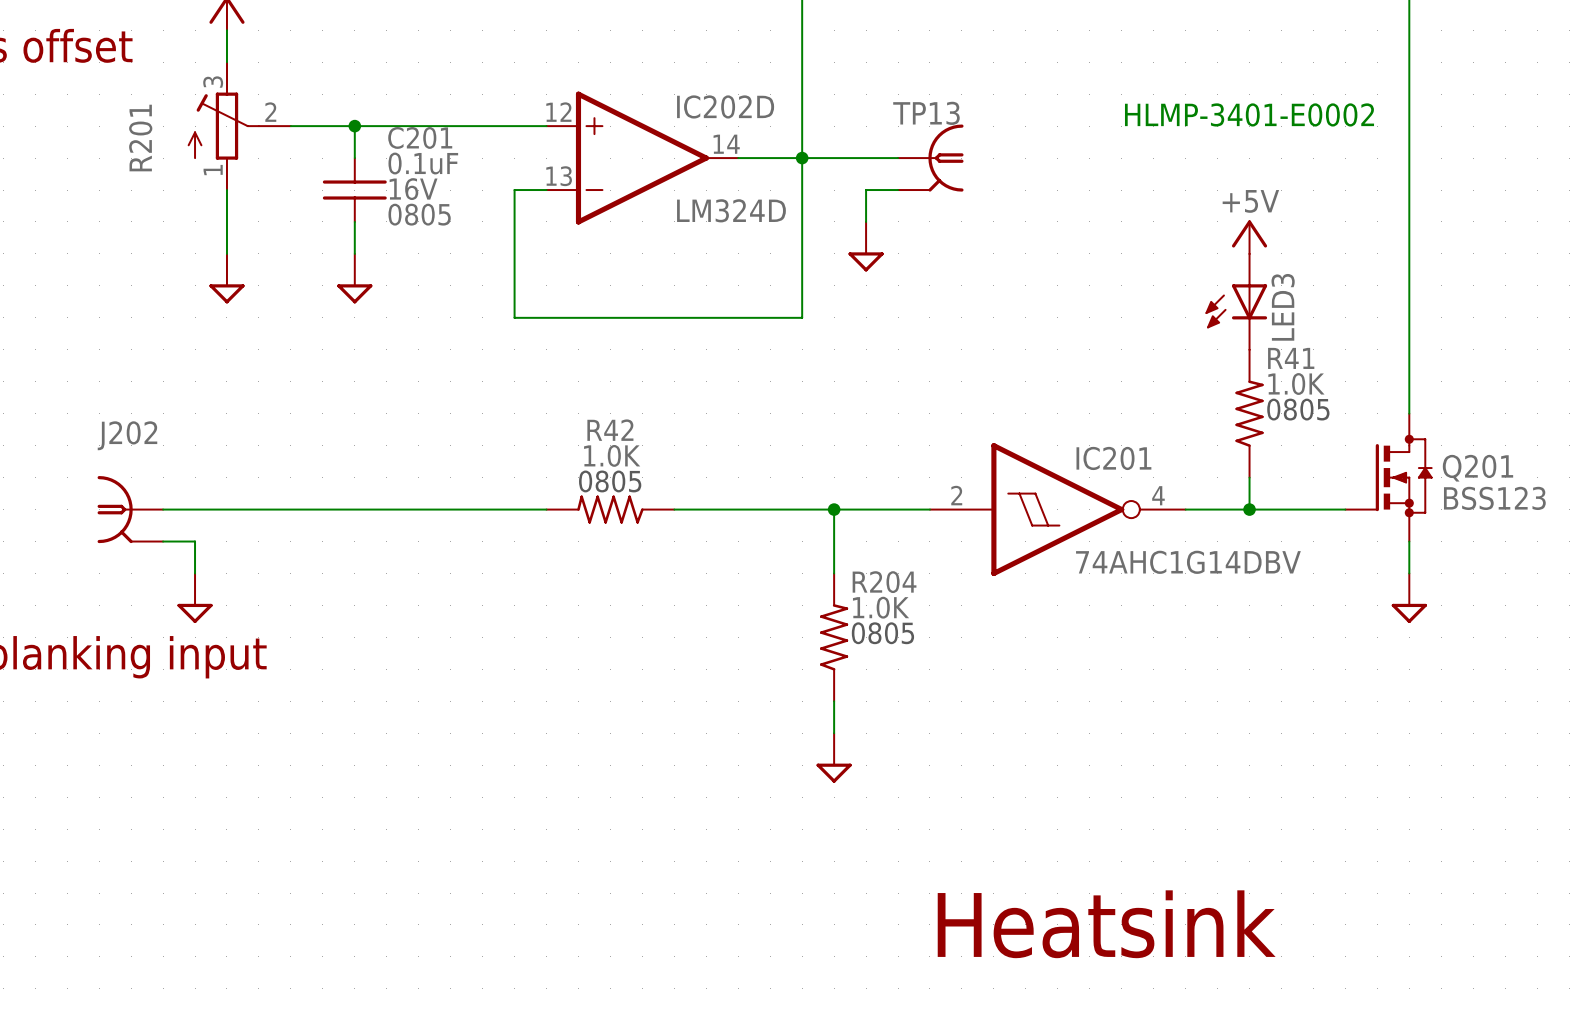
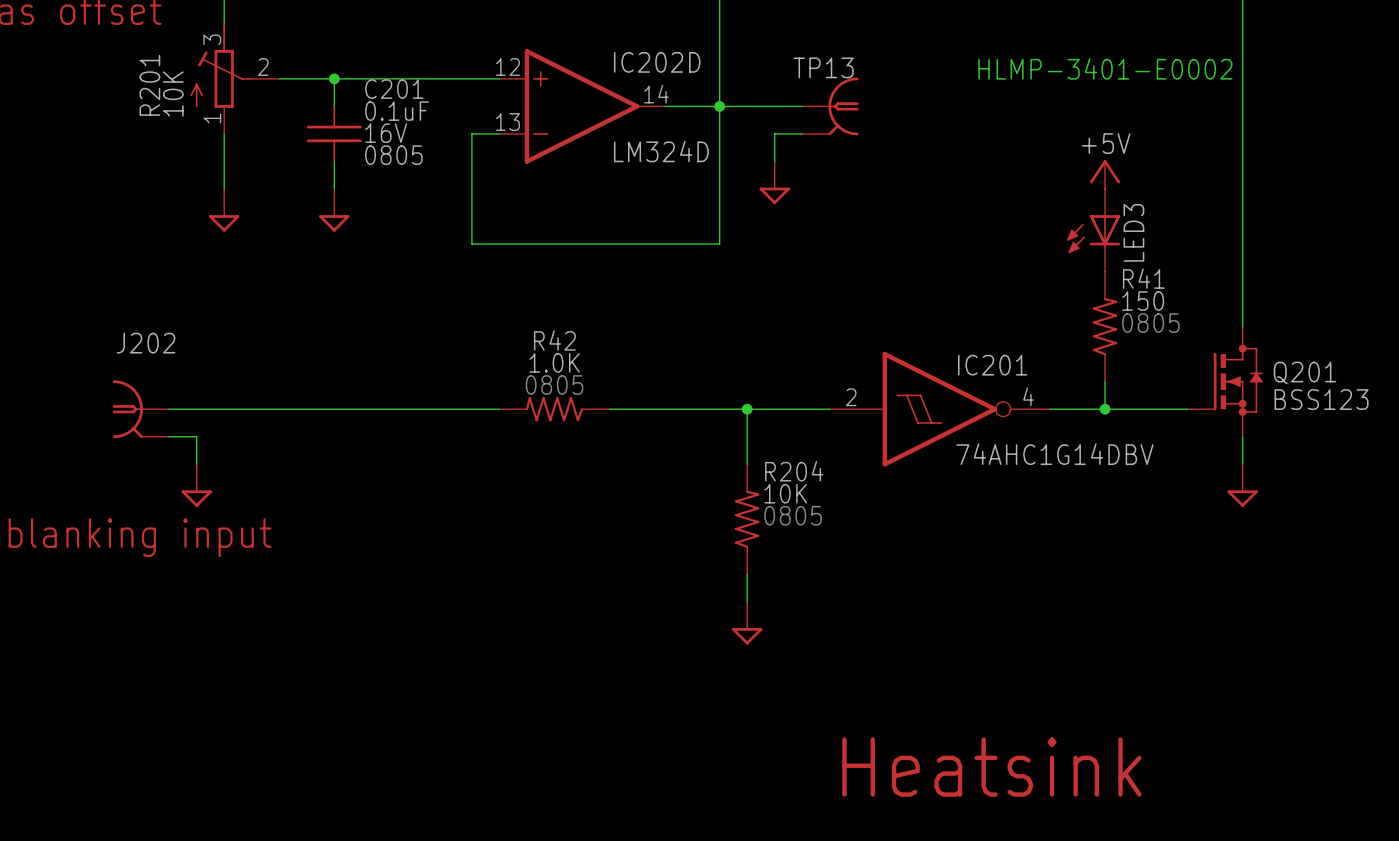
R201 value: none -> 10K (173, 93)
R41 value: 1.0K (1296, 384) -> 150 (1143, 301)
R204 value: 1.0K (881, 607) -> 10K (785, 493)

